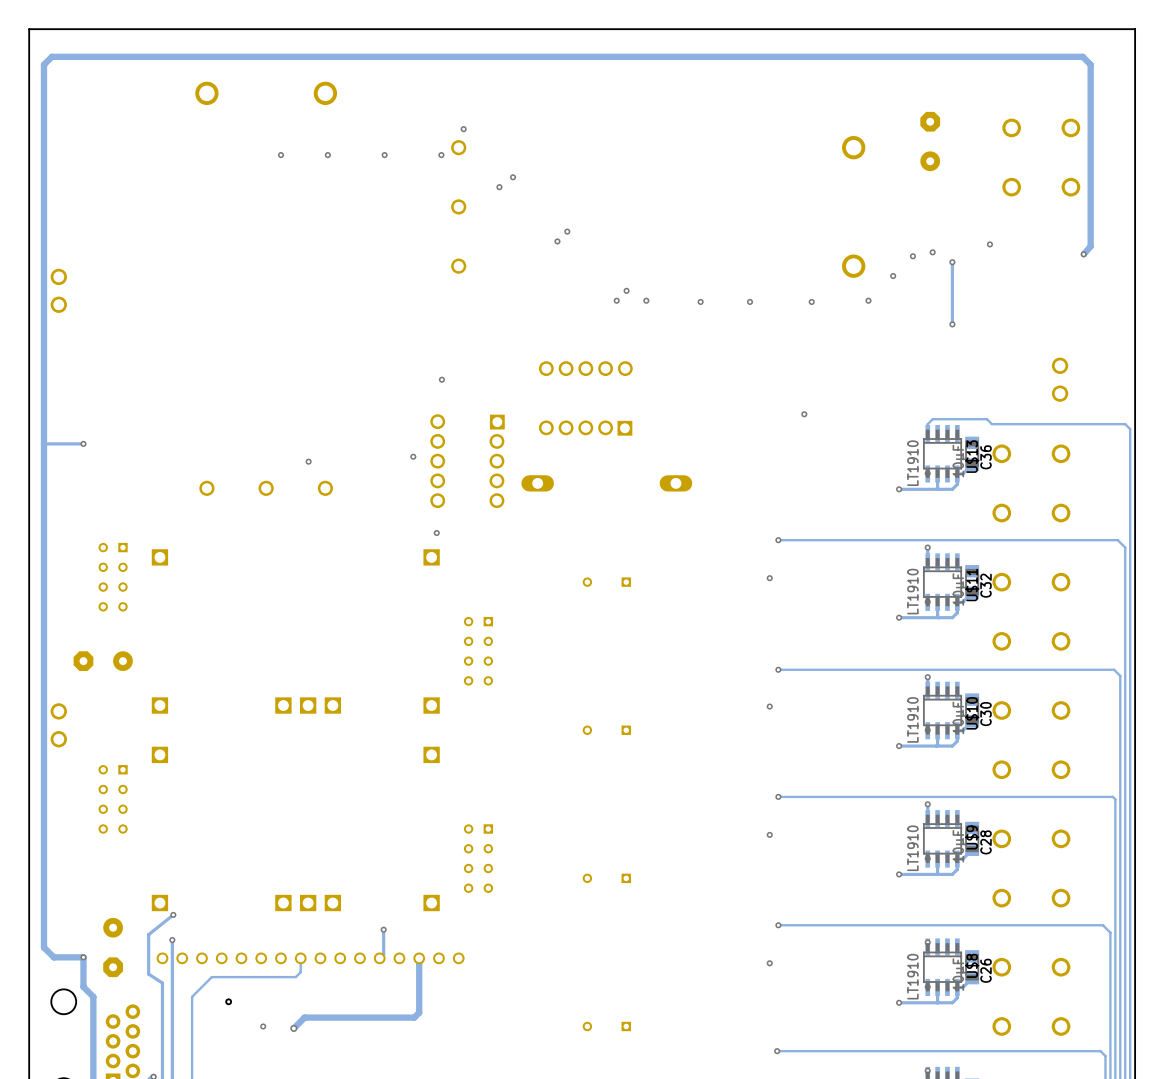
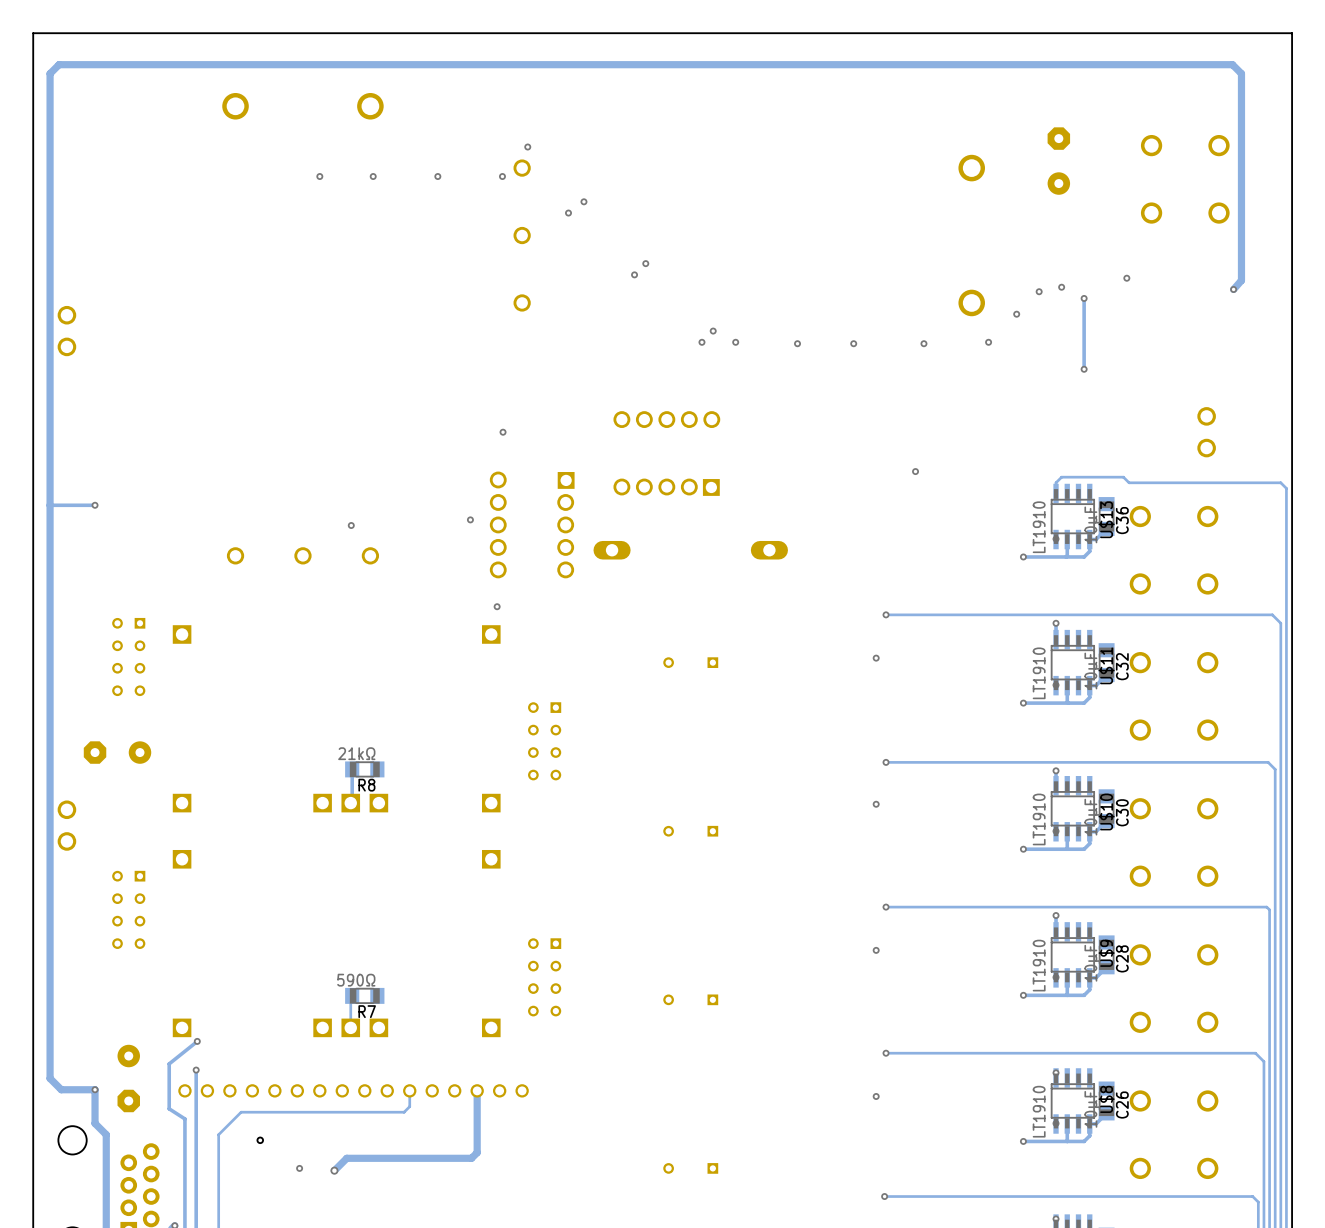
track: none -> (352, 769) (350, 803)
R8: none -> 21kΩ (364, 769)
track: none -> (352, 995) (350, 1027)
R7: none -> 590Ω (364, 995)
track: (383, 929) (383, 954) (379, 958) -> none
via: (383, 929) -> none
track: (300, 958) (300, 972) (295, 977) -> (409, 1090) (409, 1106) (404, 1112) (336, 1112)

